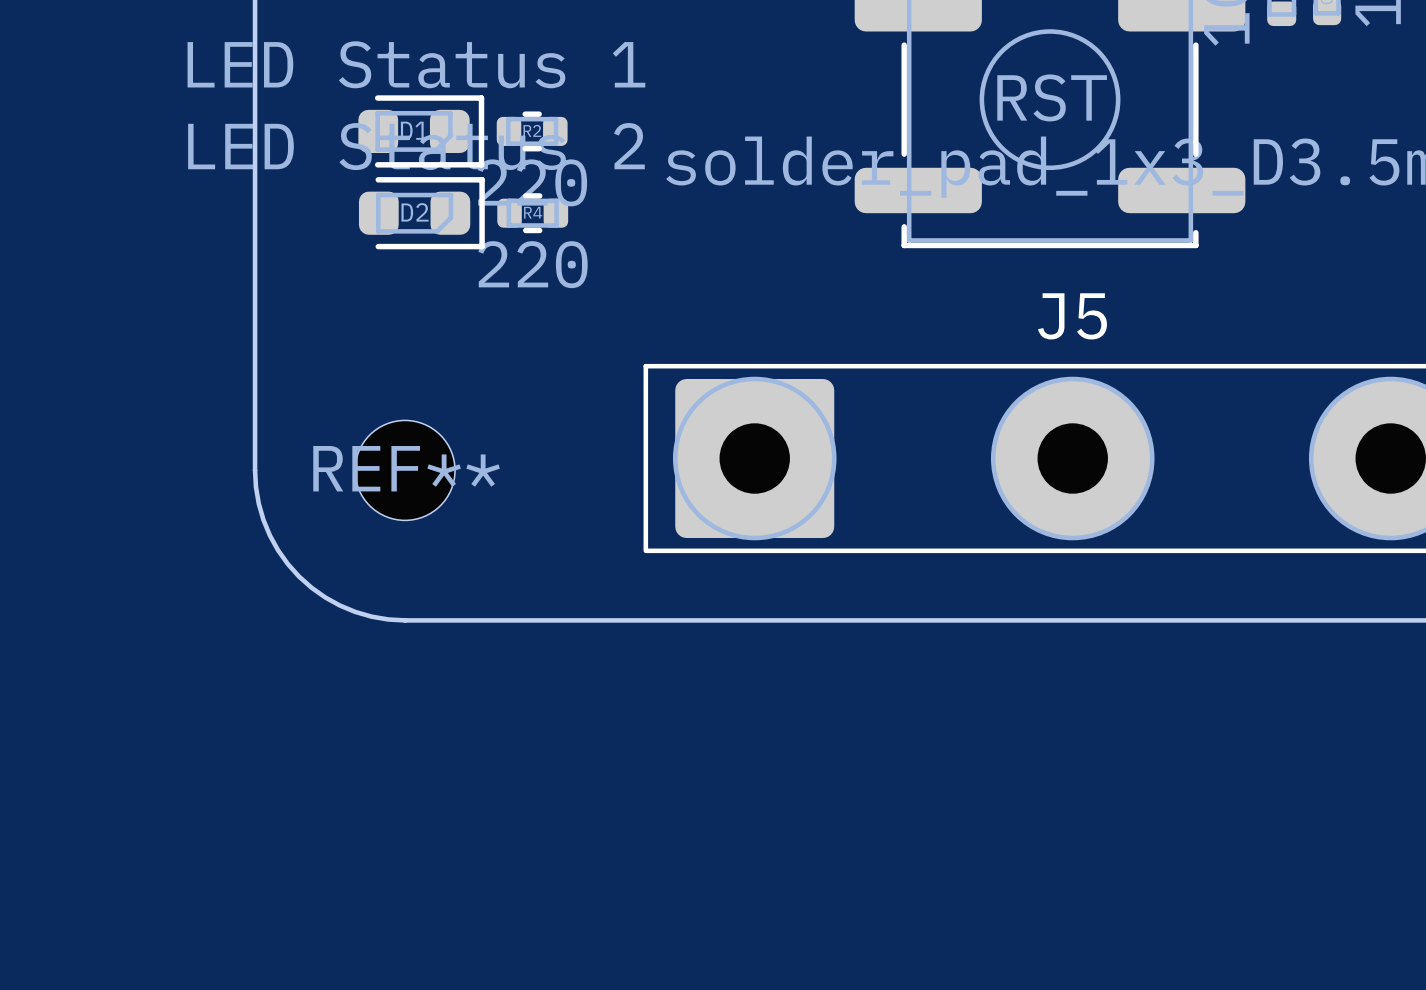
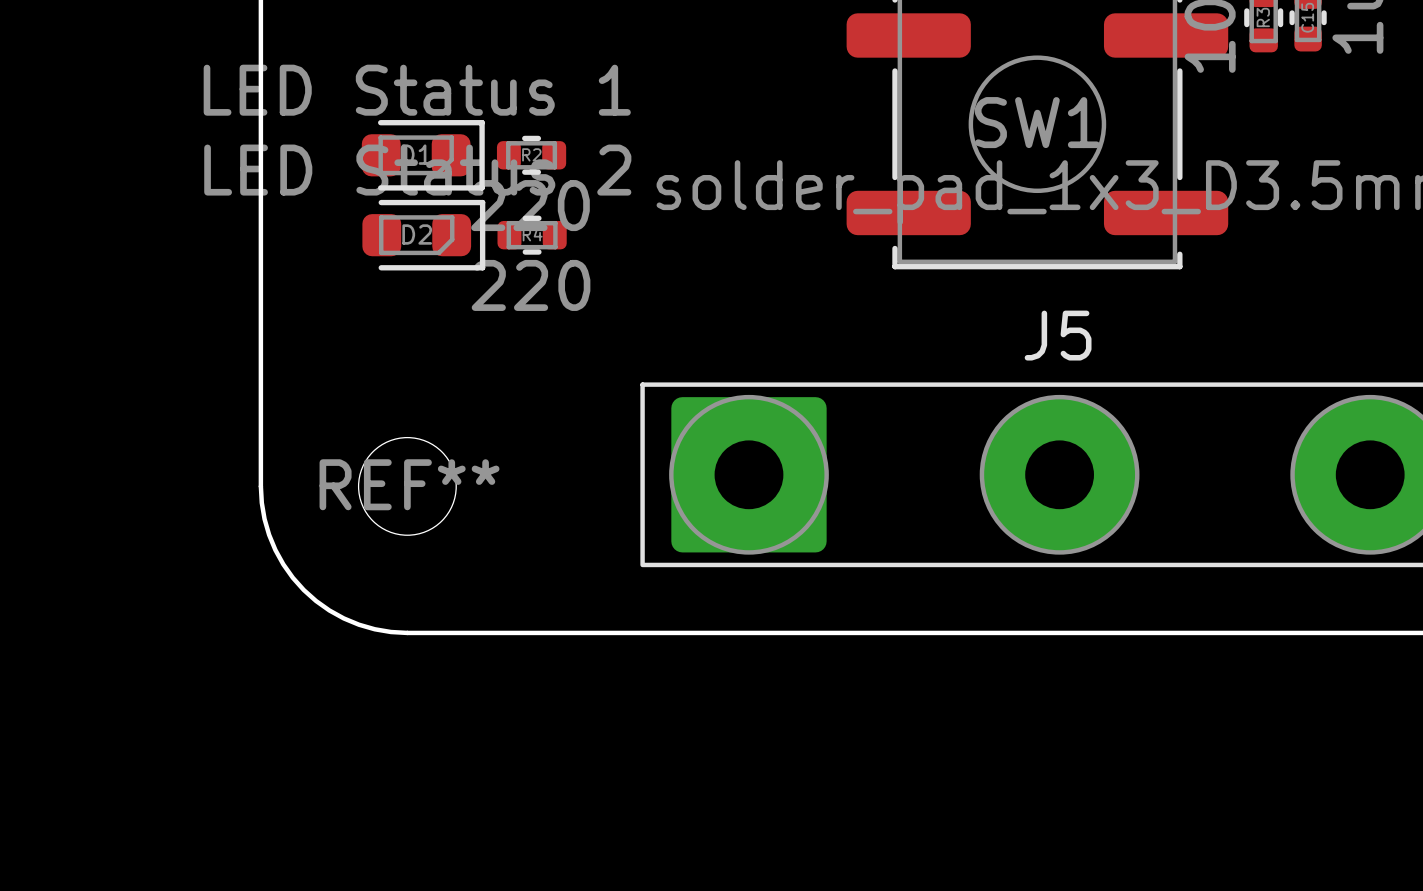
RST name: RST (1052, 97) -> SW1 (1037, 122)

